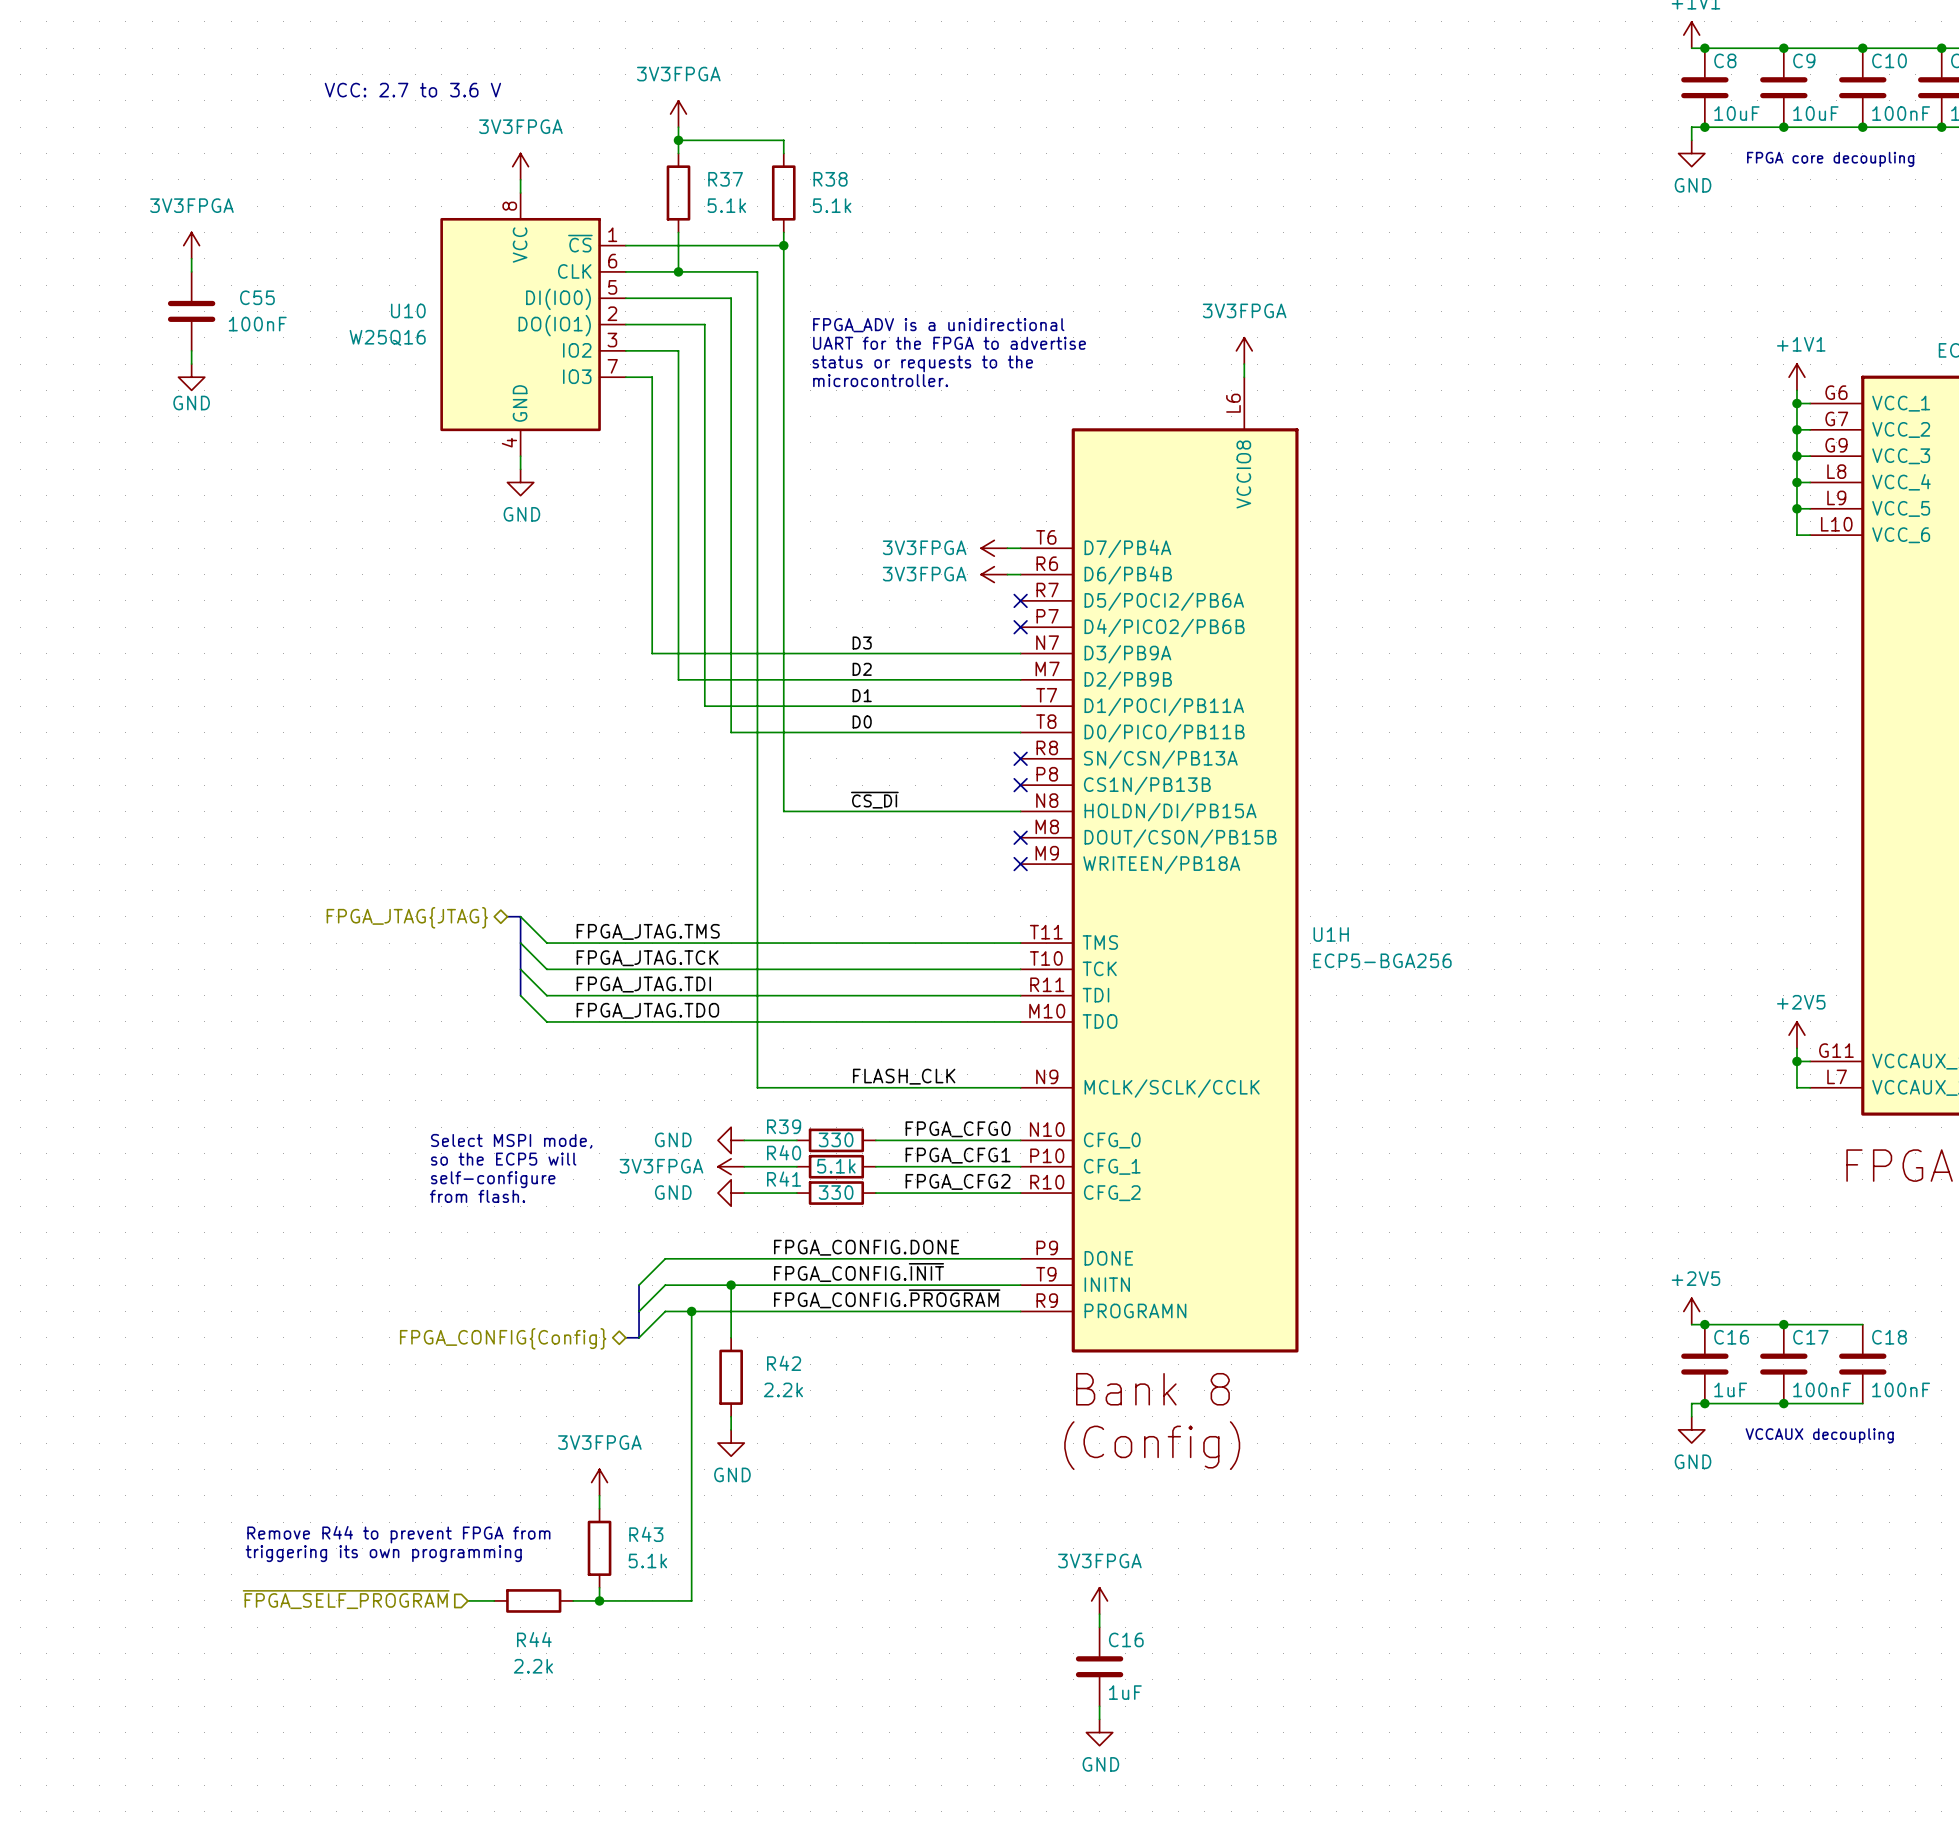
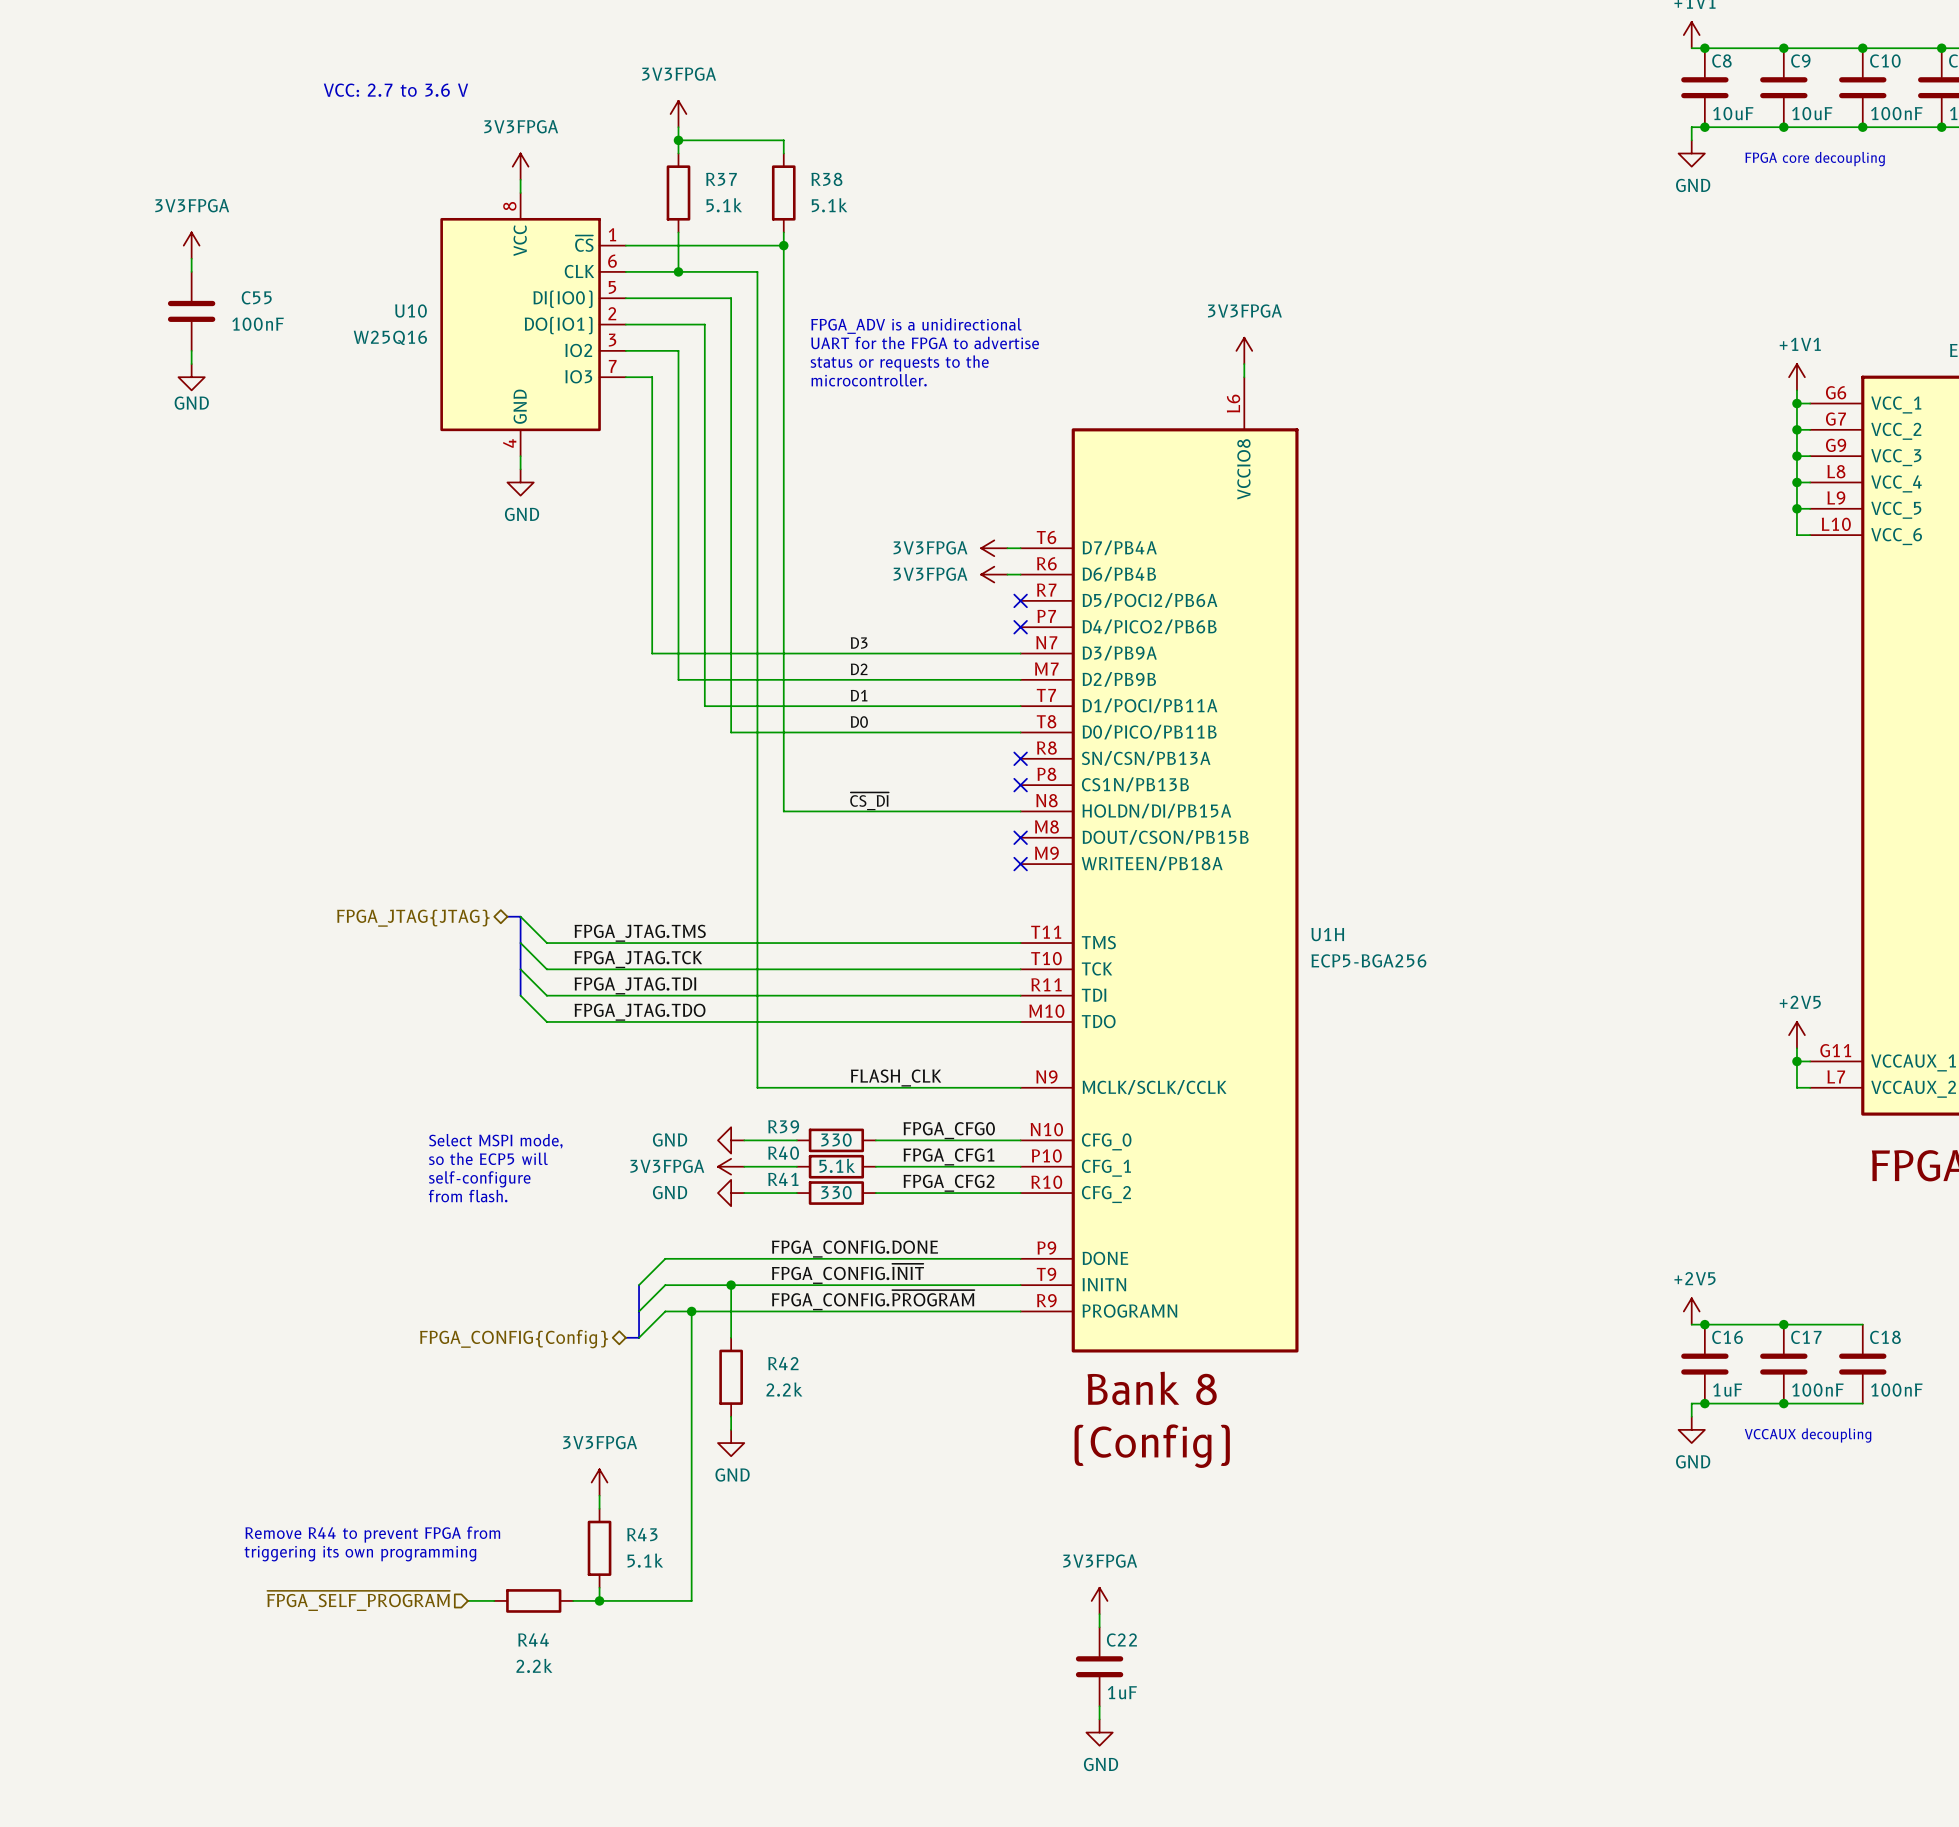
C16 name: C16 (1126, 1639) -> C22 (1121, 1640)

